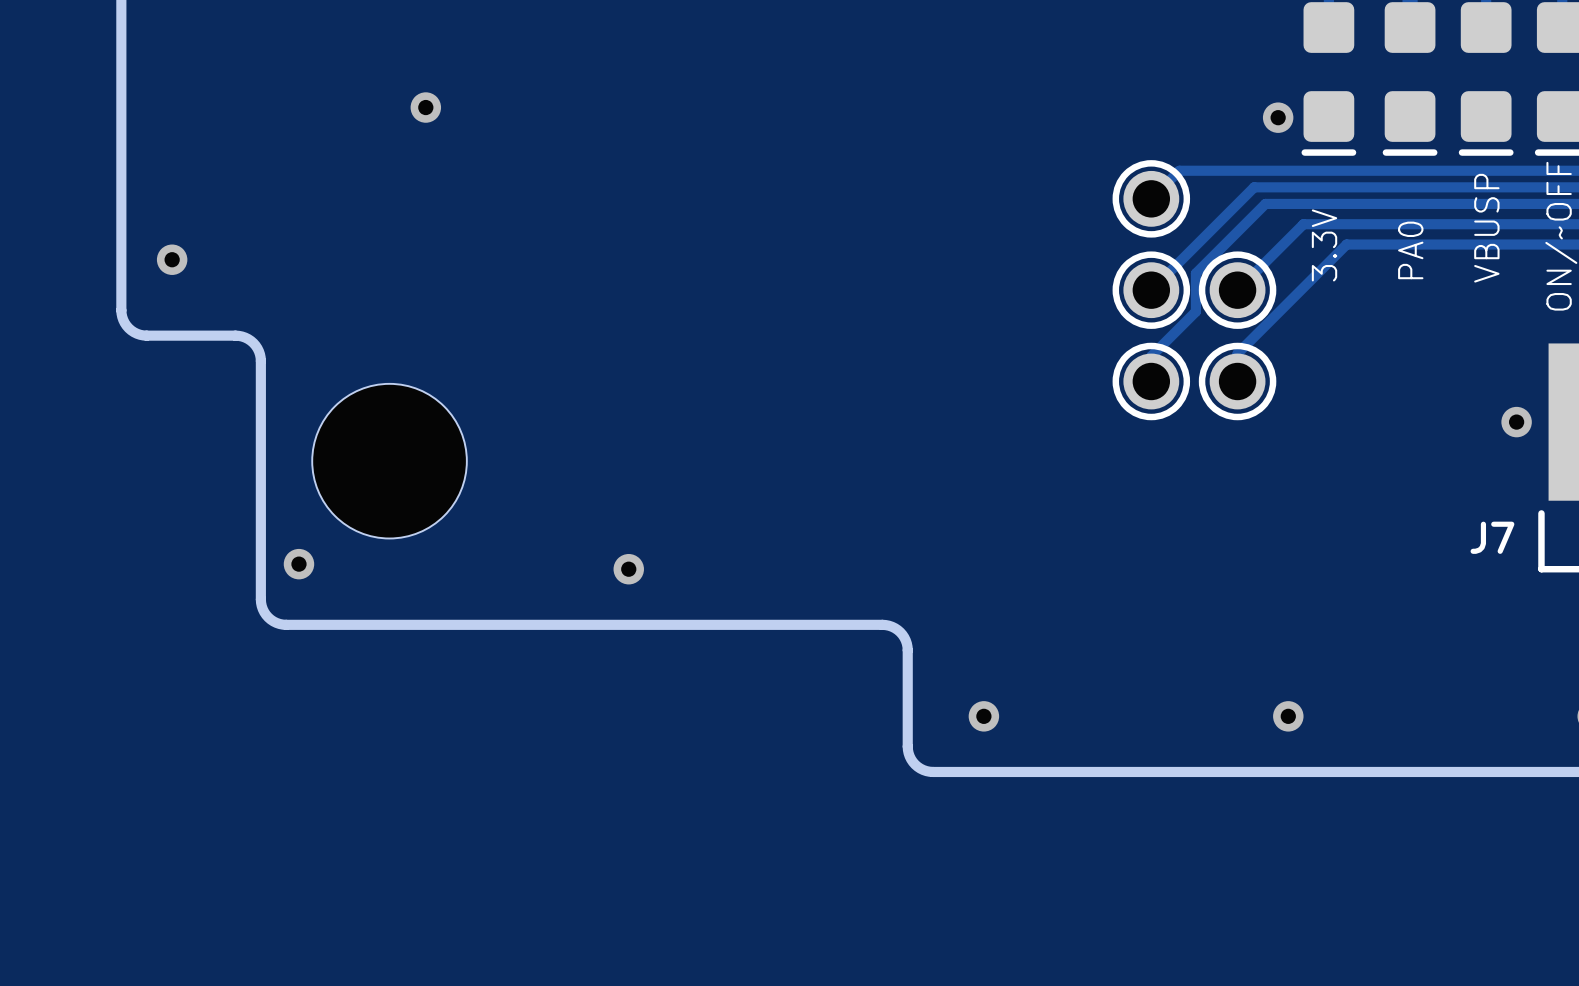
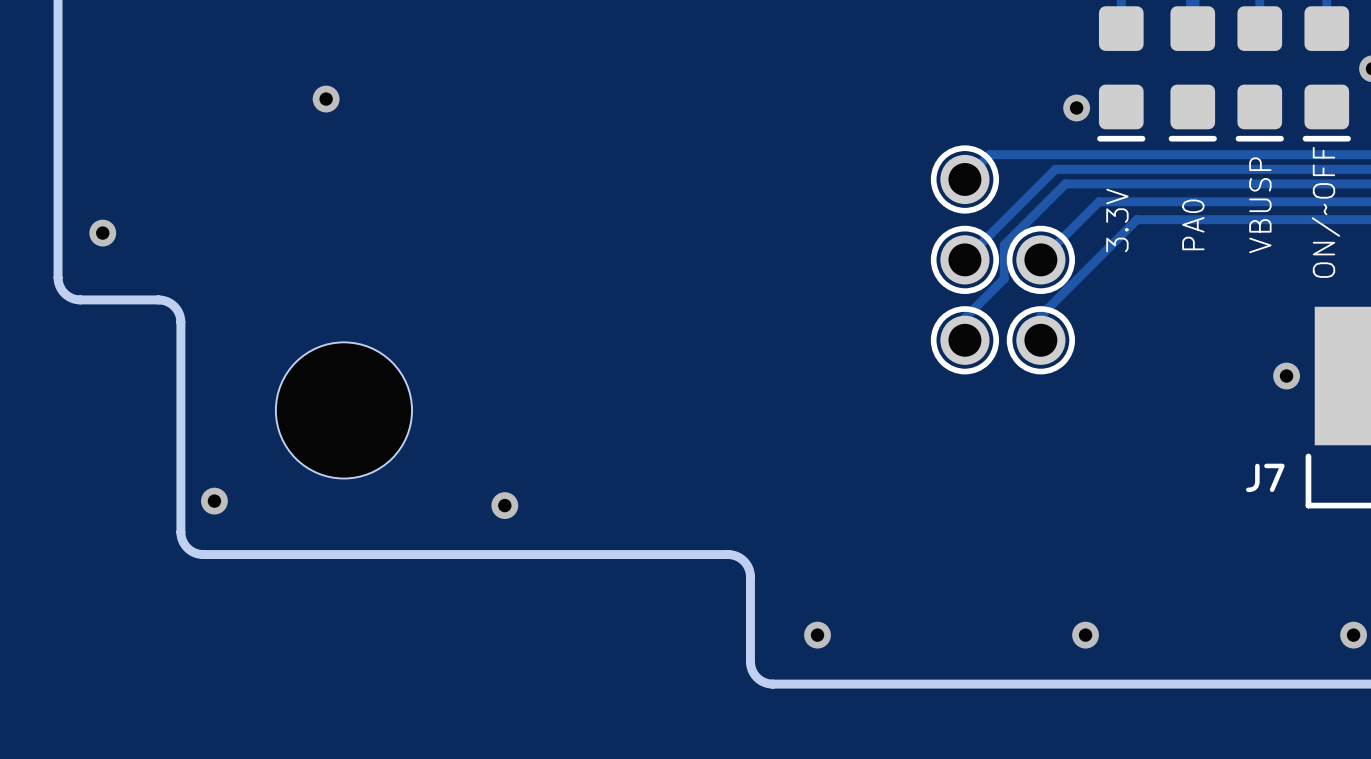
part position: (389, 461) -> (343, 410)

